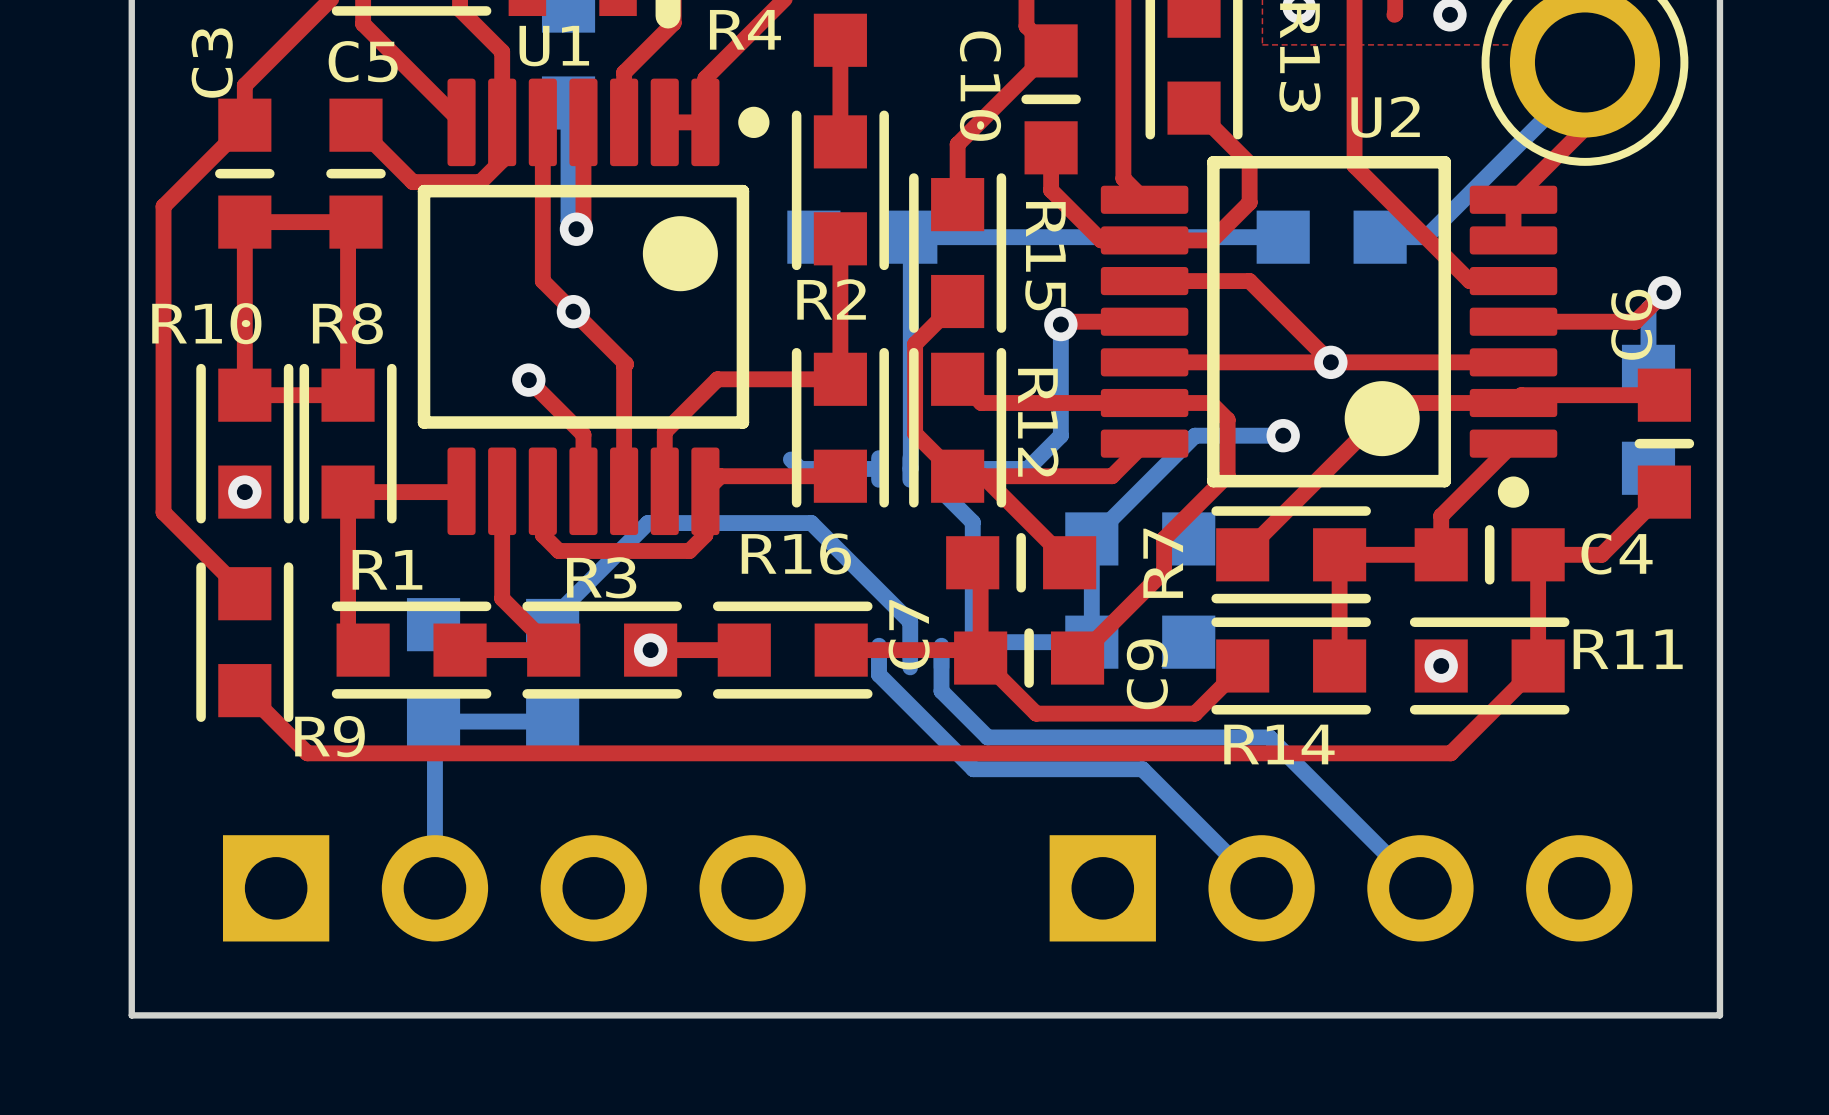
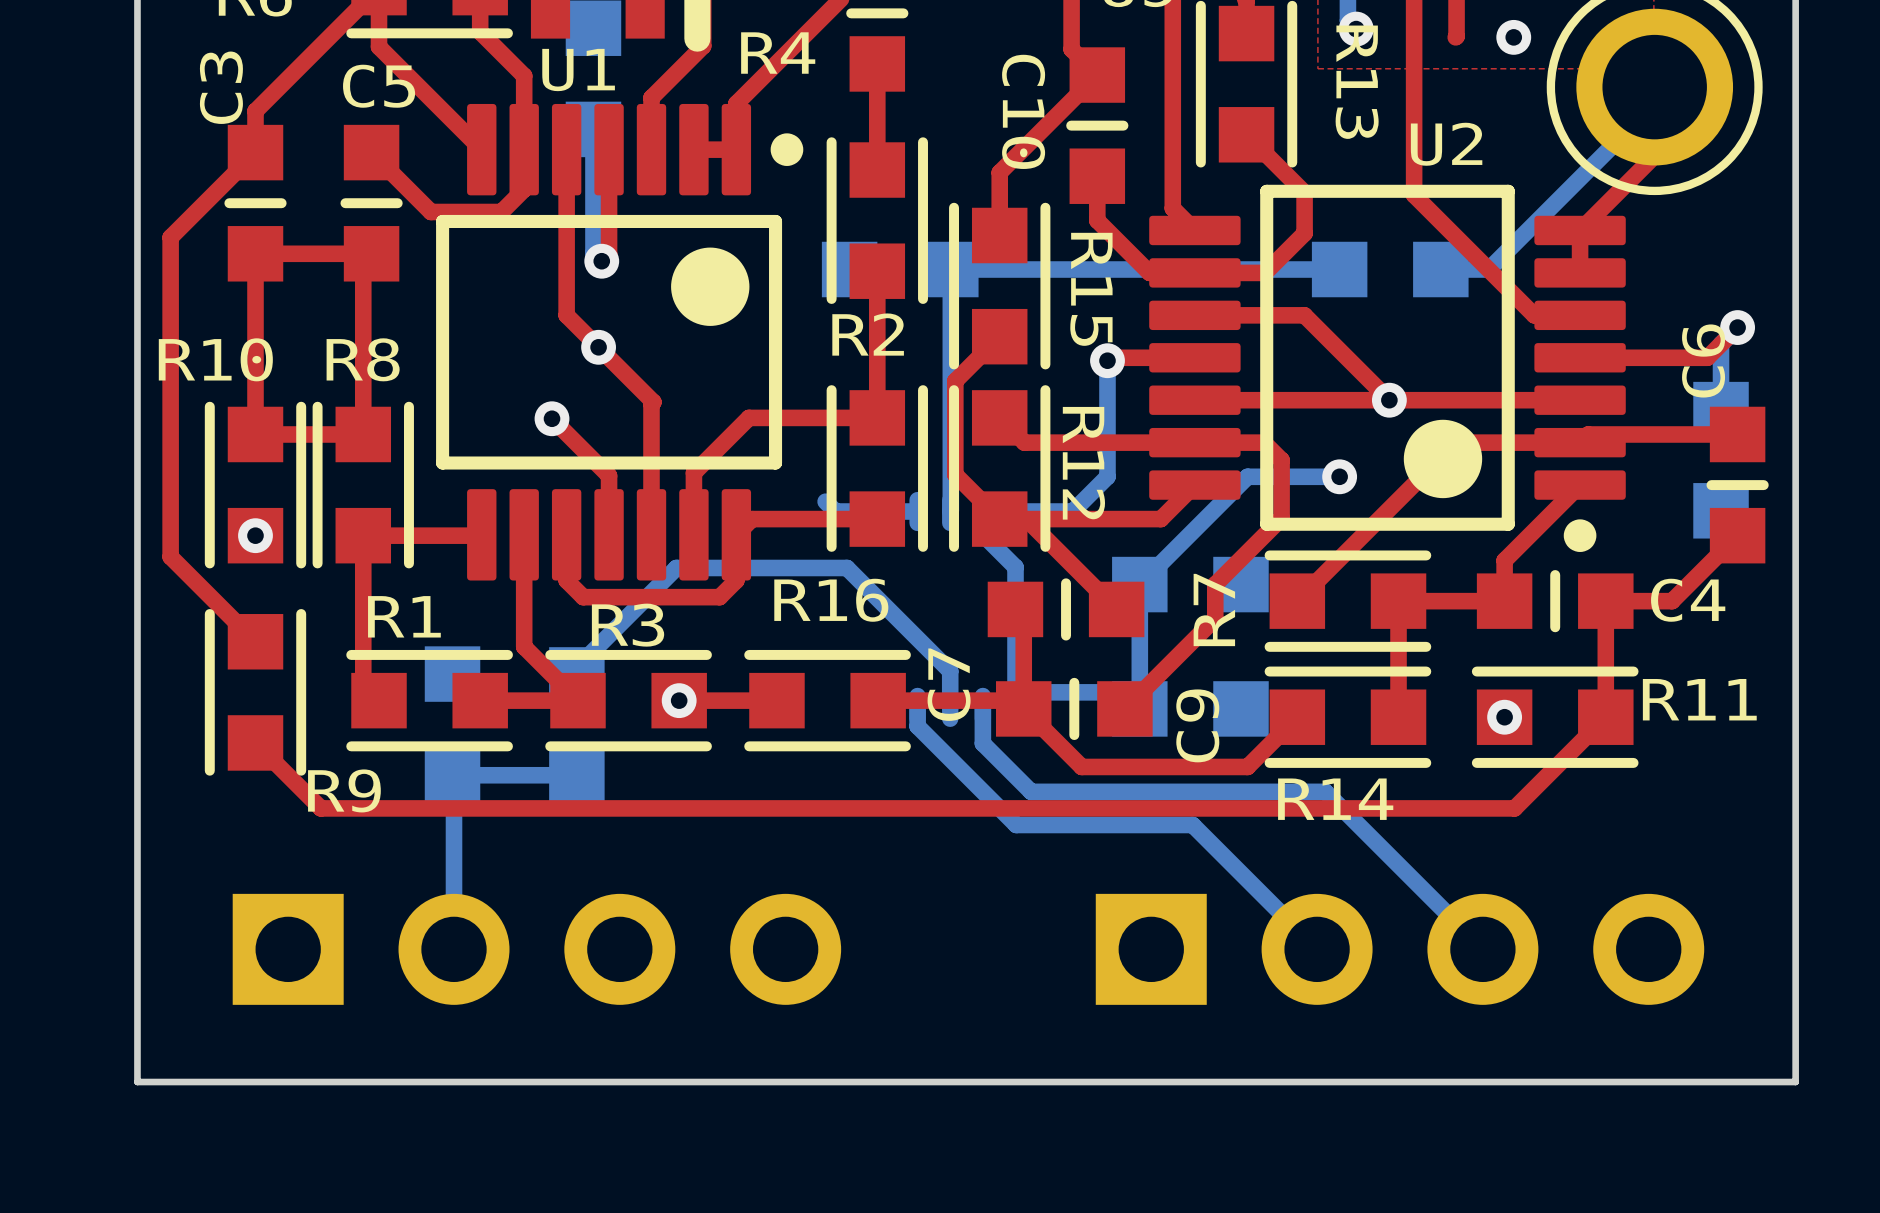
part position: (1140, 642) -> (1190, 708)

